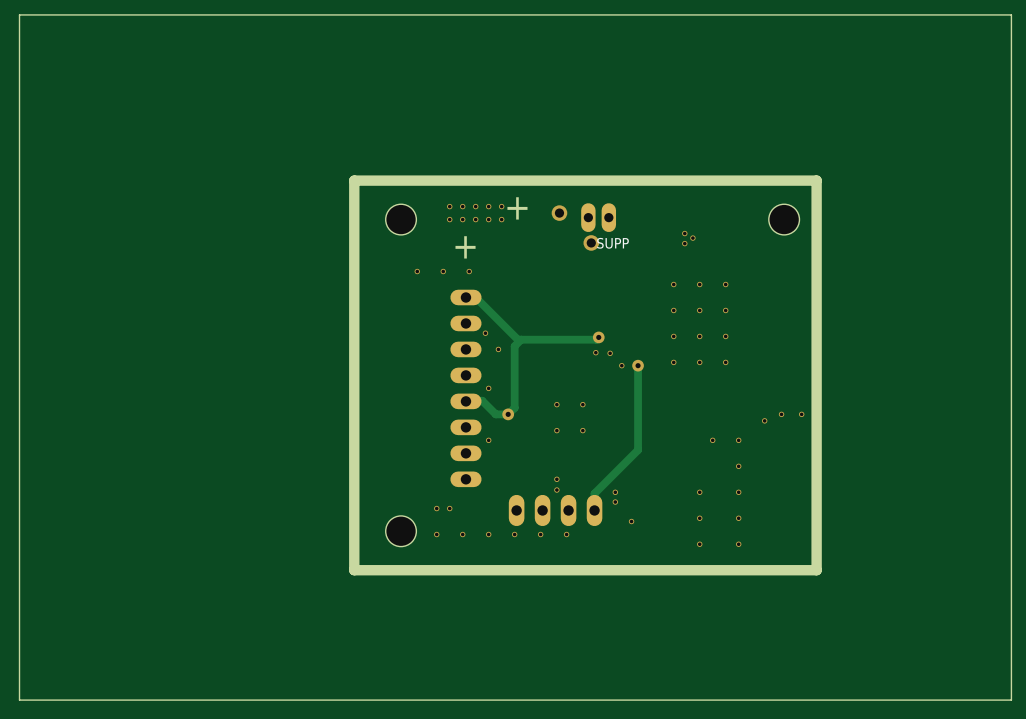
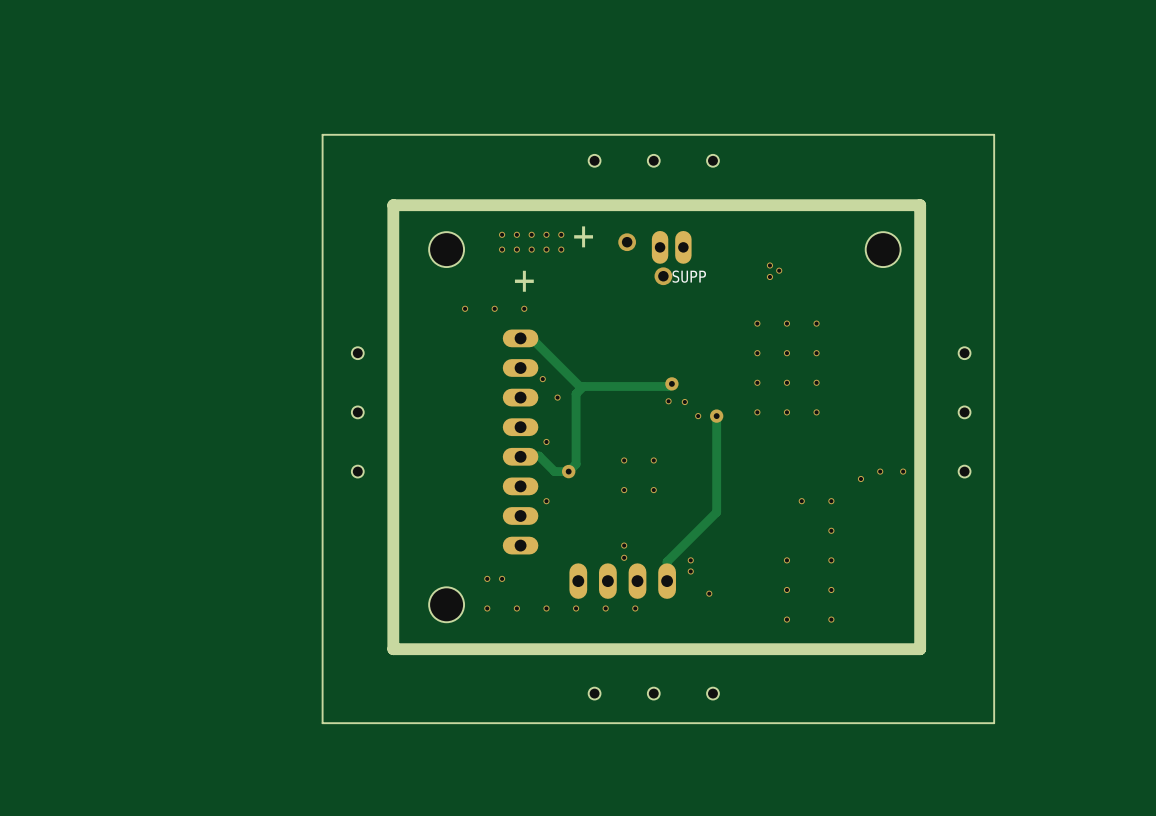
board edge: (1011, 14) (19, 14) (19, 700) (1011, 700) (1011, 14) -> none
board edge: none -> (994, 134) (322, 134) (322, 723) (994, 723) (994, 134)
hole: none -> (594, 160)
hole: none -> (653, 160)
hole: none -> (712, 160)
hole: none -> (357, 353)
hole: none -> (964, 353)
hole: none -> (357, 412)
hole: none -> (964, 412)
hole: none -> (357, 471)
hole: none -> (964, 471)
hole: none -> (594, 693)
hole: none -> (653, 693)
hole: none -> (712, 693)

